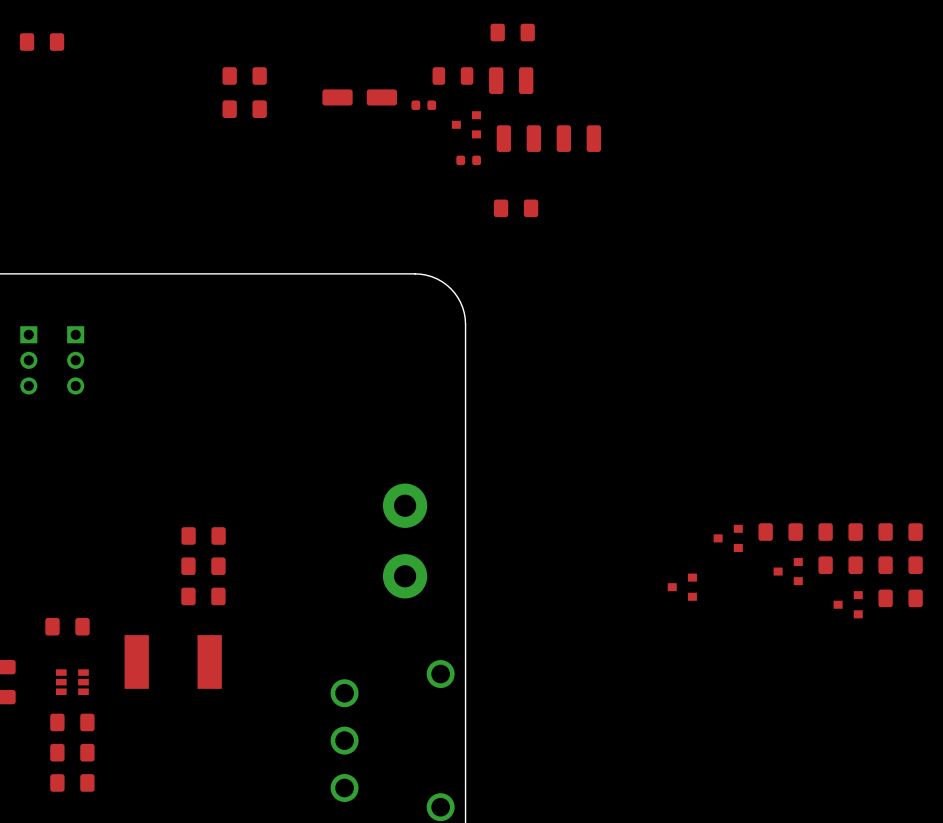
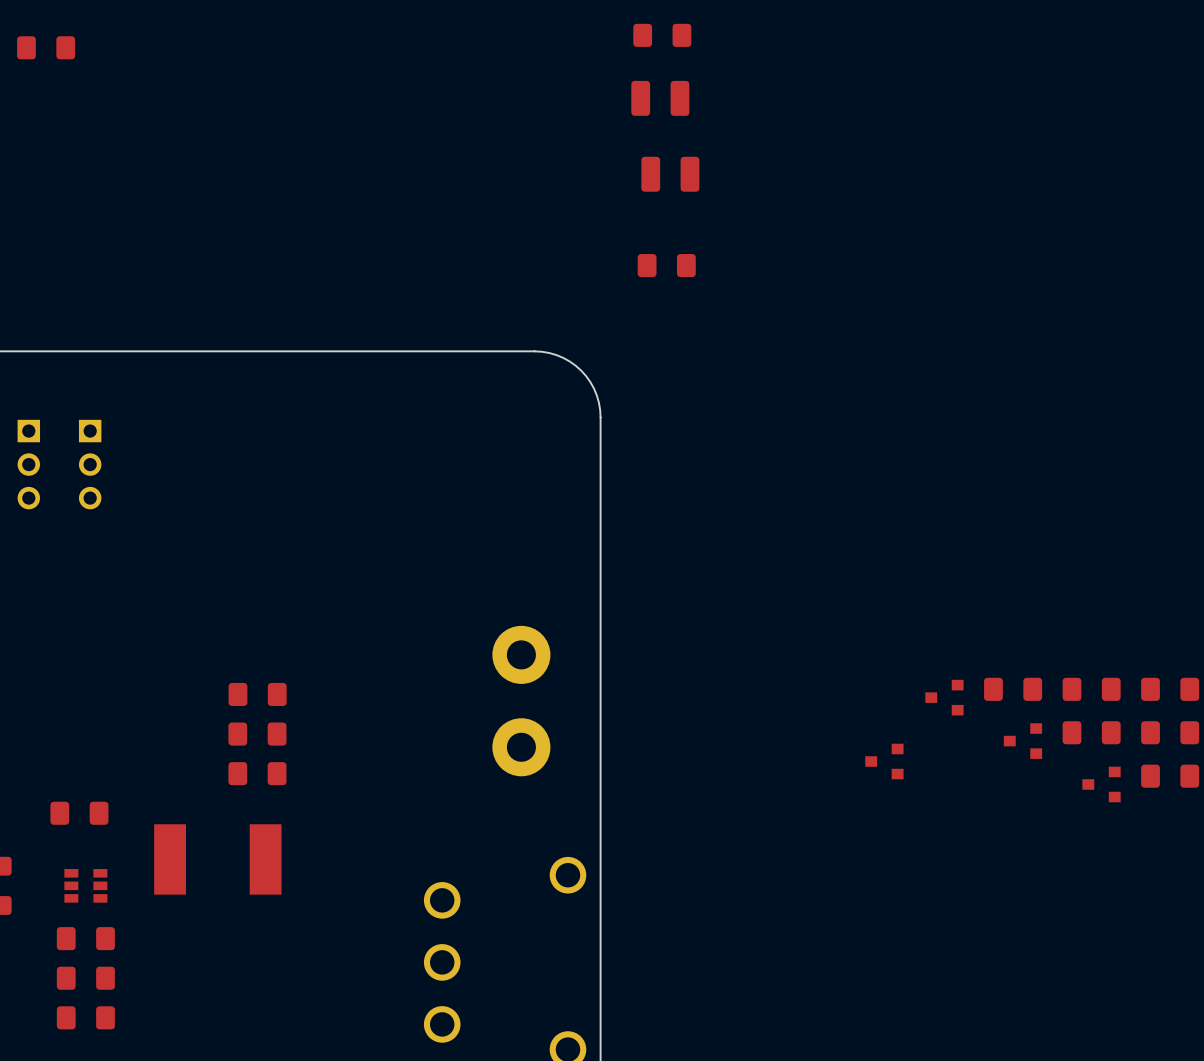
part: (244, 76) -> none
part: (452, 76) -> none
part: (359, 97) -> none
part: (423, 105) -> none
part: (244, 109) -> none
part: (466, 124) -> none
part: (578, 138) -> none
part: (468, 160) -> none

